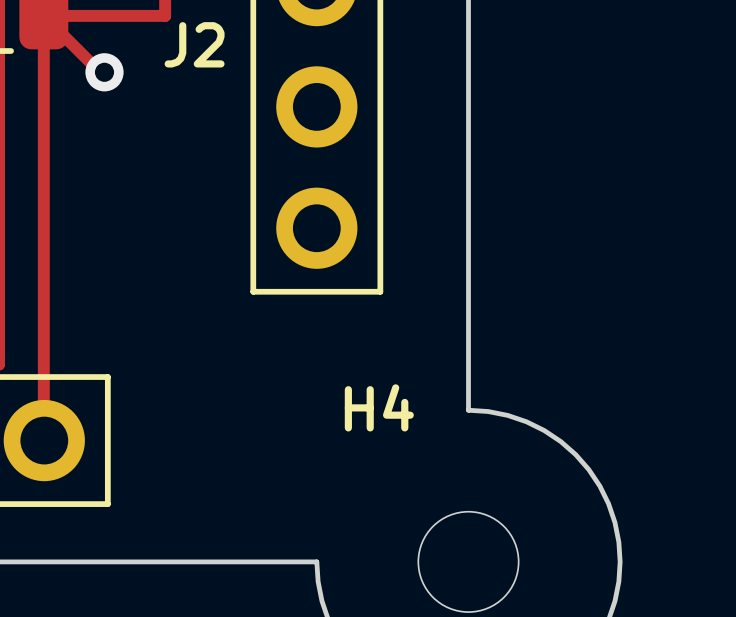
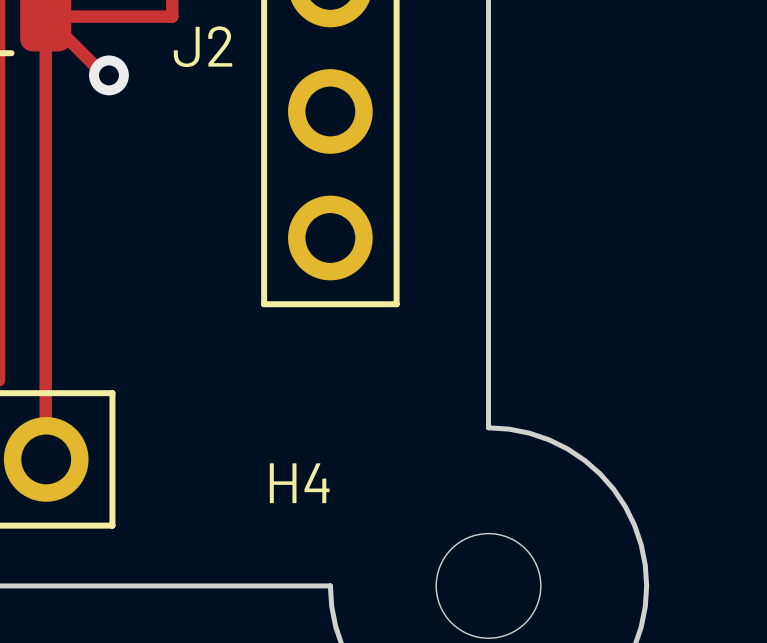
H4 name position: H4 (379, 407) -> H4 (299, 483)

